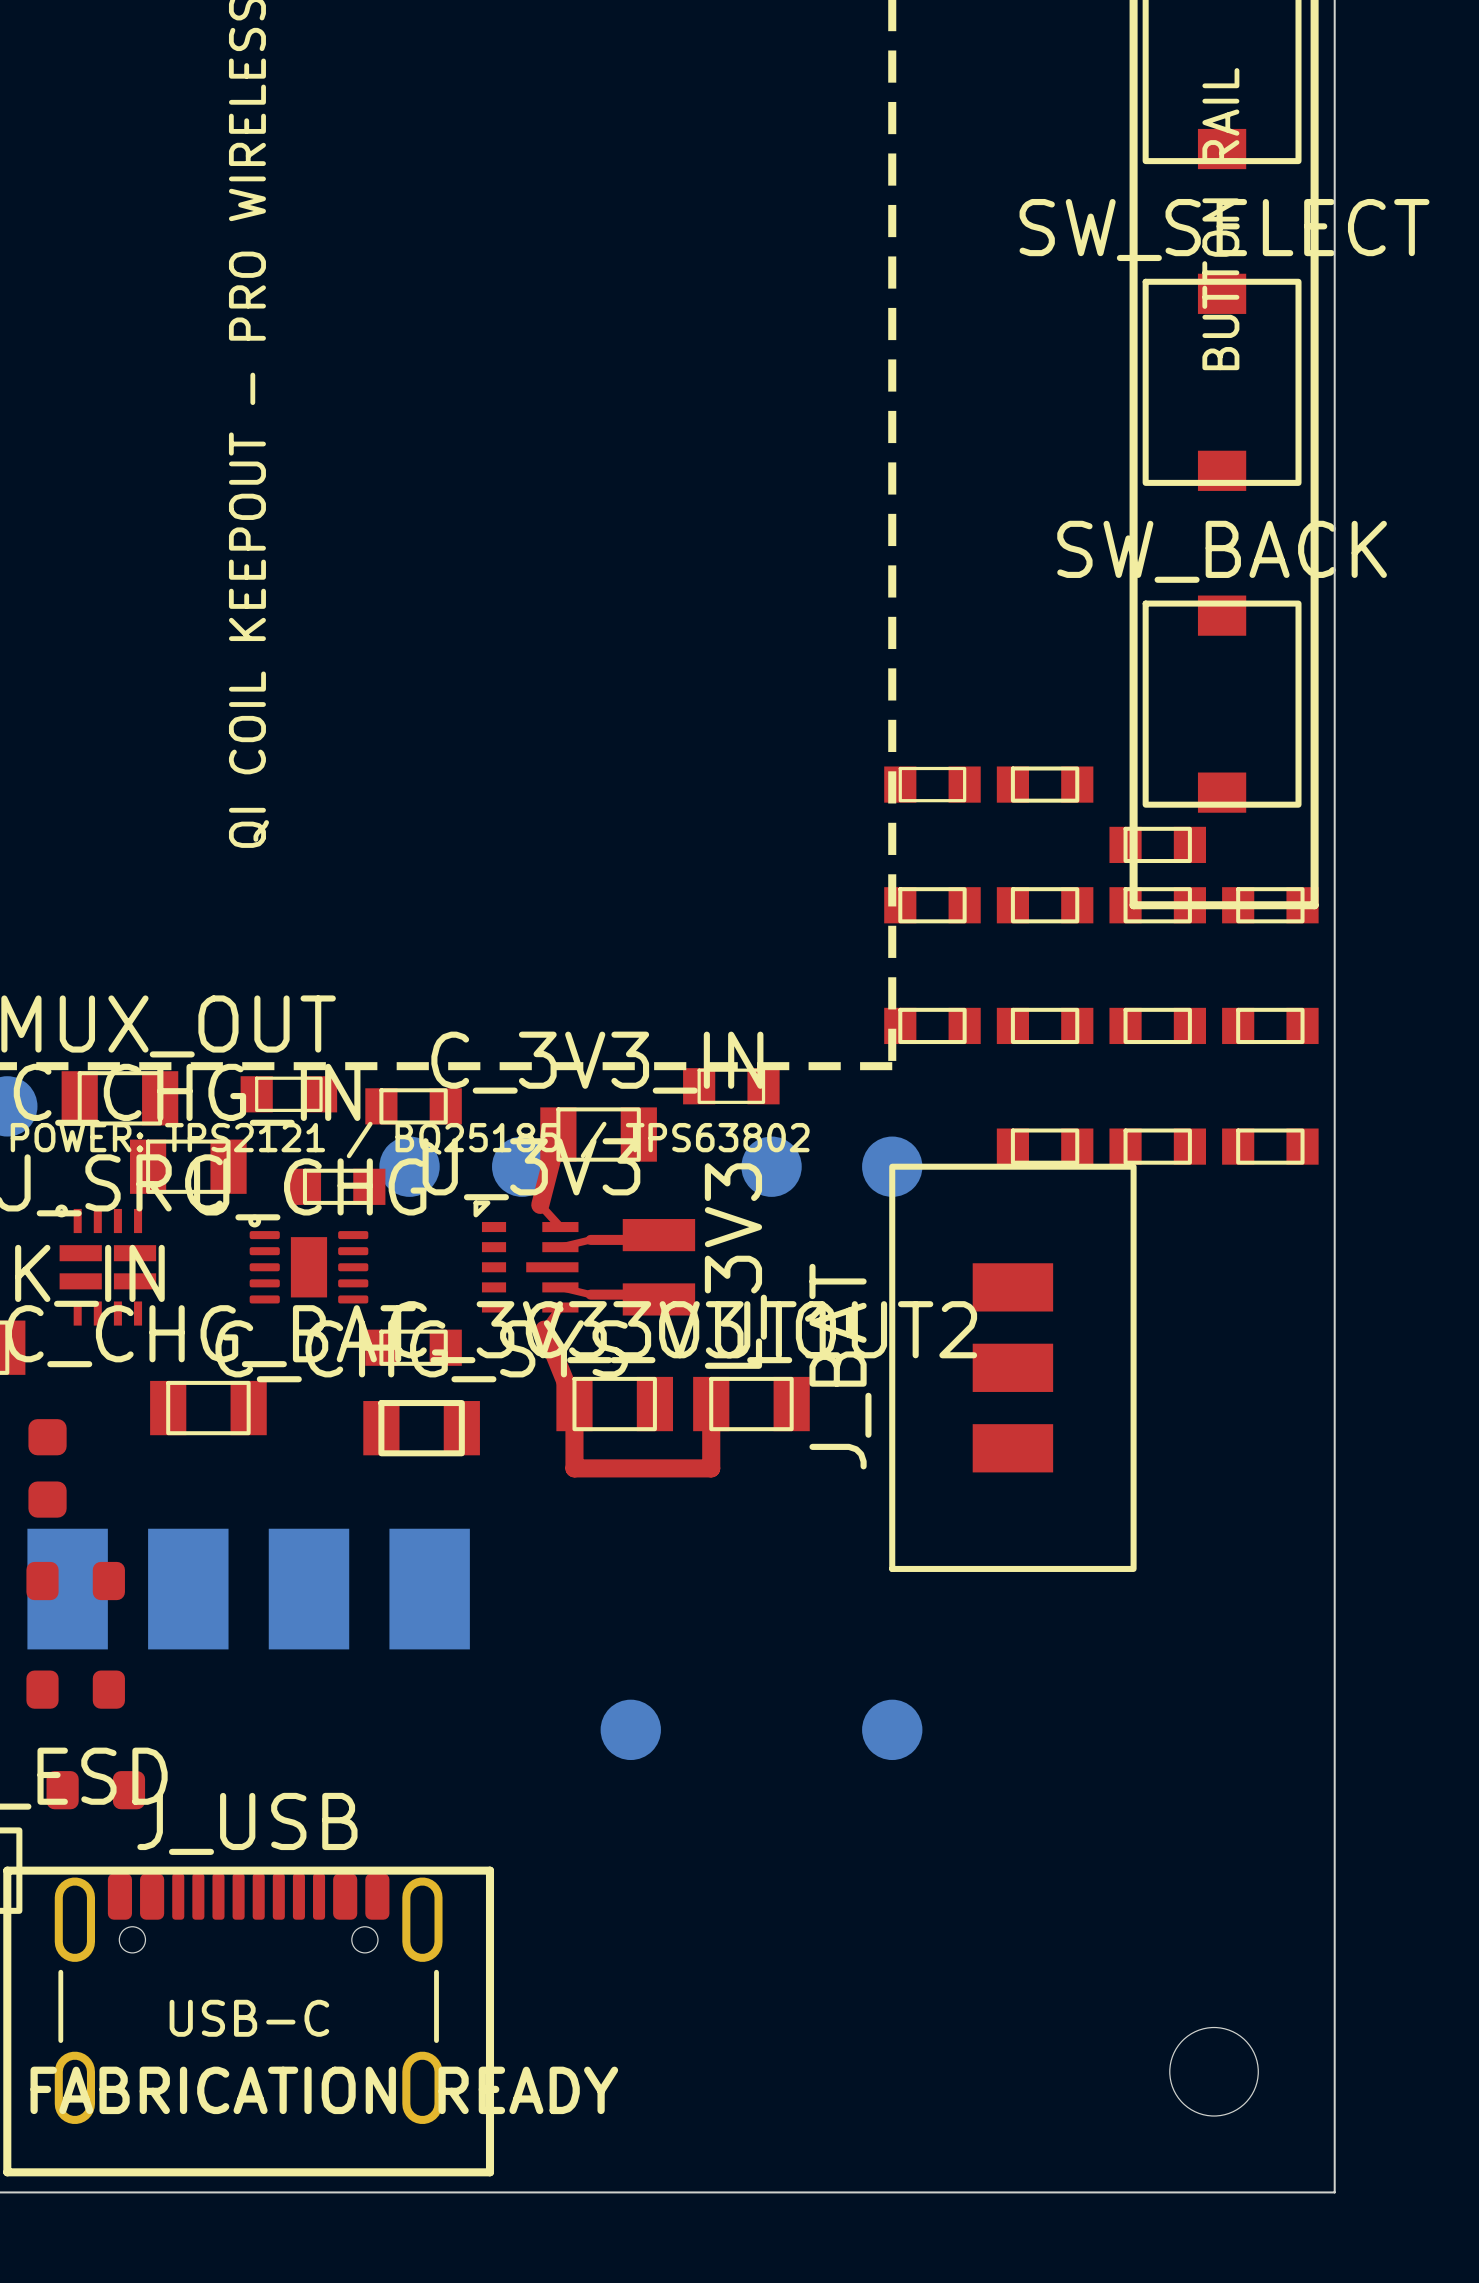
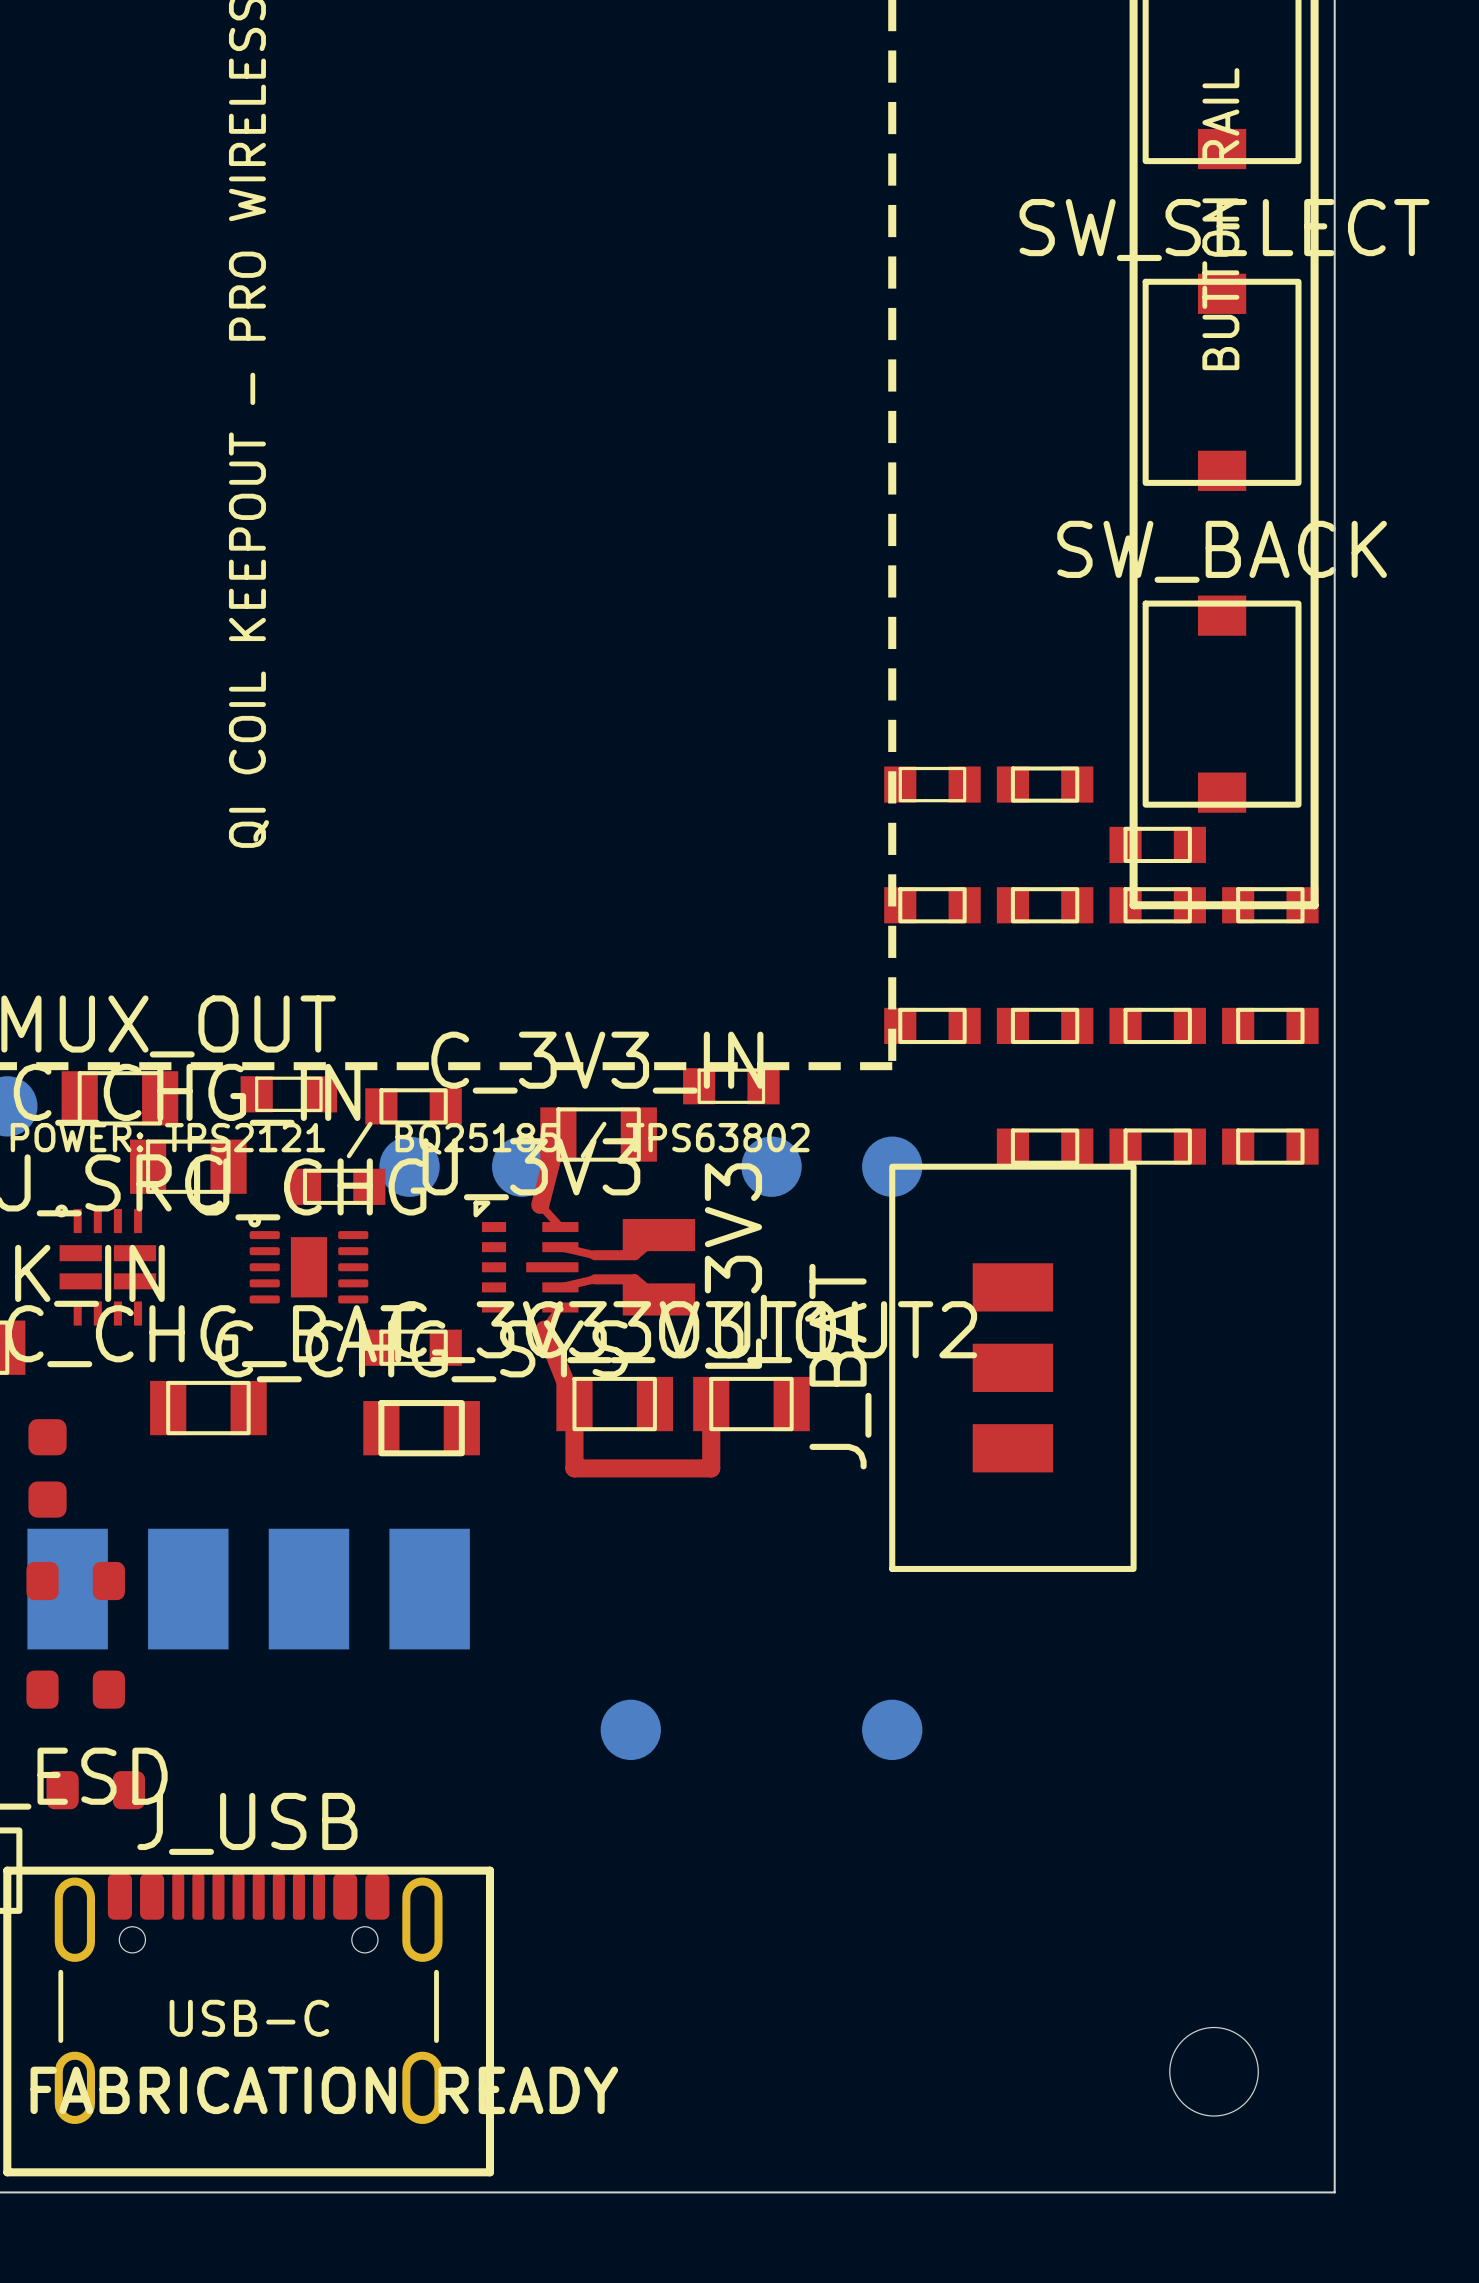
top track: (658, 1235) (634, 1239) (590, 1239) (560, 1247) -> (658, 1235) (634, 1255) (594, 1255) (560, 1247)
top track: (560, 1287) (590, 1294) (634, 1294) (658, 1299) -> (560, 1287) (594, 1279) (634, 1279) (658, 1299)

